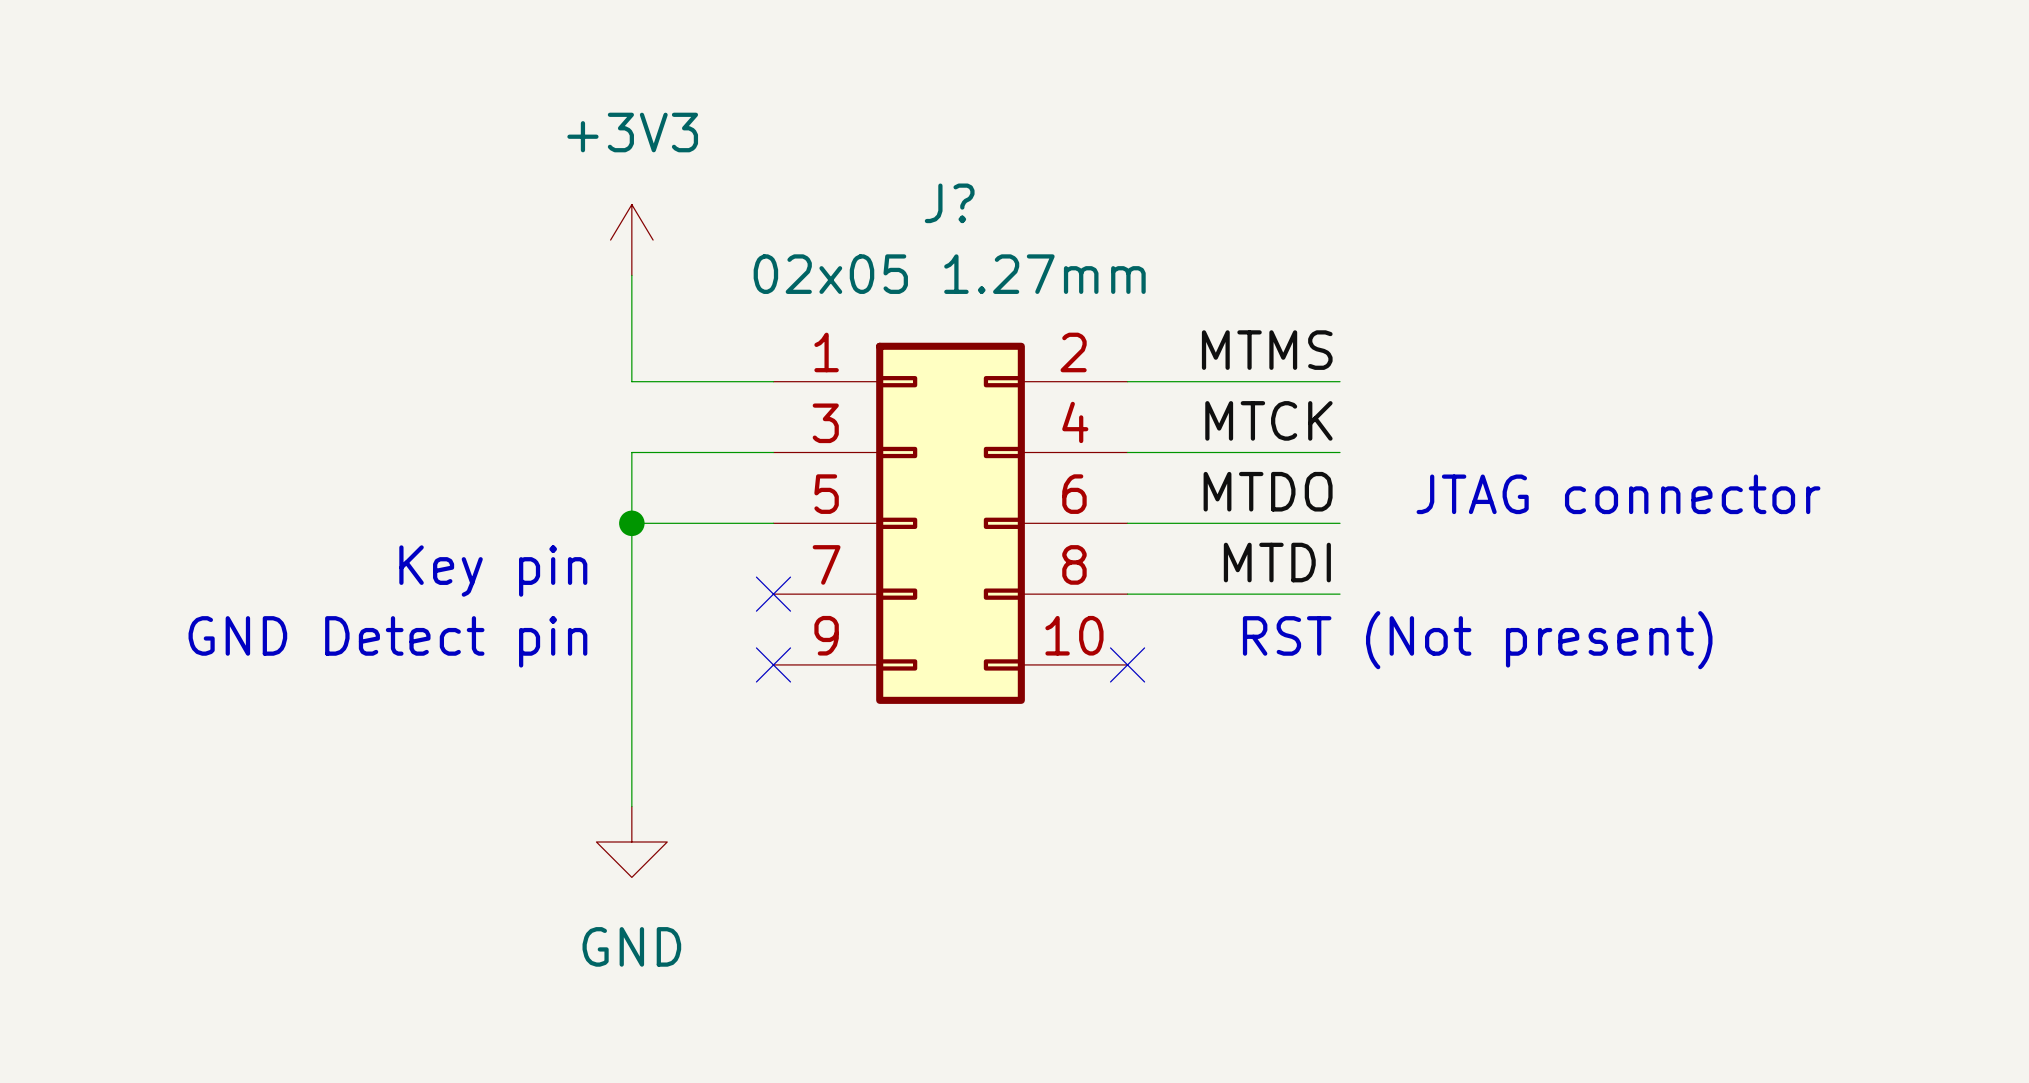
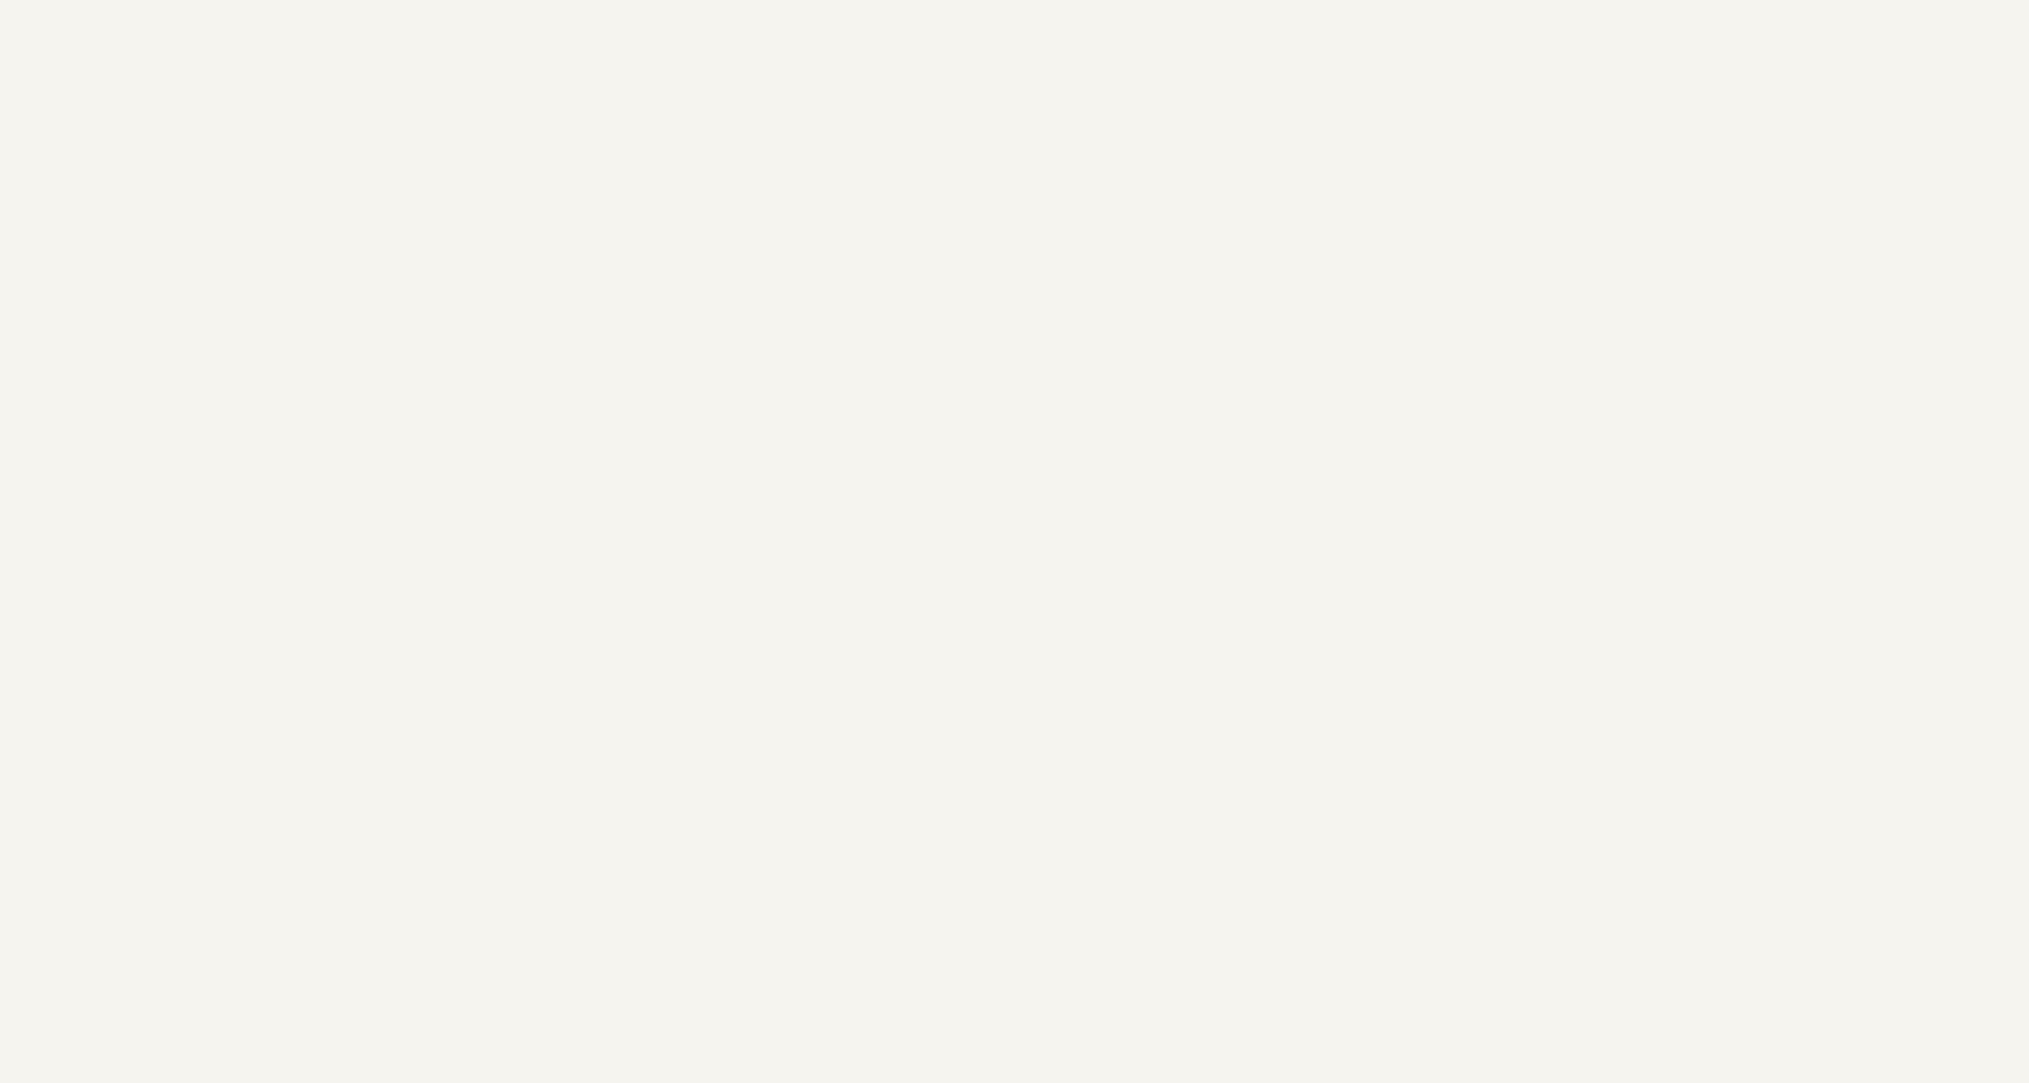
power symbol: +3V3 (631, 240) -> none
wire: (631, 275) (631, 381) (773, 381) -> none
label: MTMS (1267, 350) -> none
wire: (1127, 381) (1340, 381) -> none
label: MTCK (1268, 420) -> none
wire: (773, 452) (631, 452) (631, 806) -> none
wire: (1127, 452) (1340, 452) -> none
label: MTDO (1268, 491) -> none
text: JTAG connector (1618, 494) -> none
wire: (631, 523) (773, 523) -> none
junction: (631, 523) -> none
J?: 02x05 1.27mm (950, 523) -> none
wire: (1127, 523) (1340, 523) -> none
label: MTDI (1277, 562) -> none
text: Key pin (493, 571) -> none
no-connect mark: (773, 594) -> none
wire: (1127, 594) (1340, 594) -> none
text: RST (Not present) (1477, 640) -> none
text: GND Detect pin (387, 641) -> none
no-connect mark: (773, 664) -> none
no-connect mark: (1127, 664) -> none
power symbol: GND (631, 841) -> none

